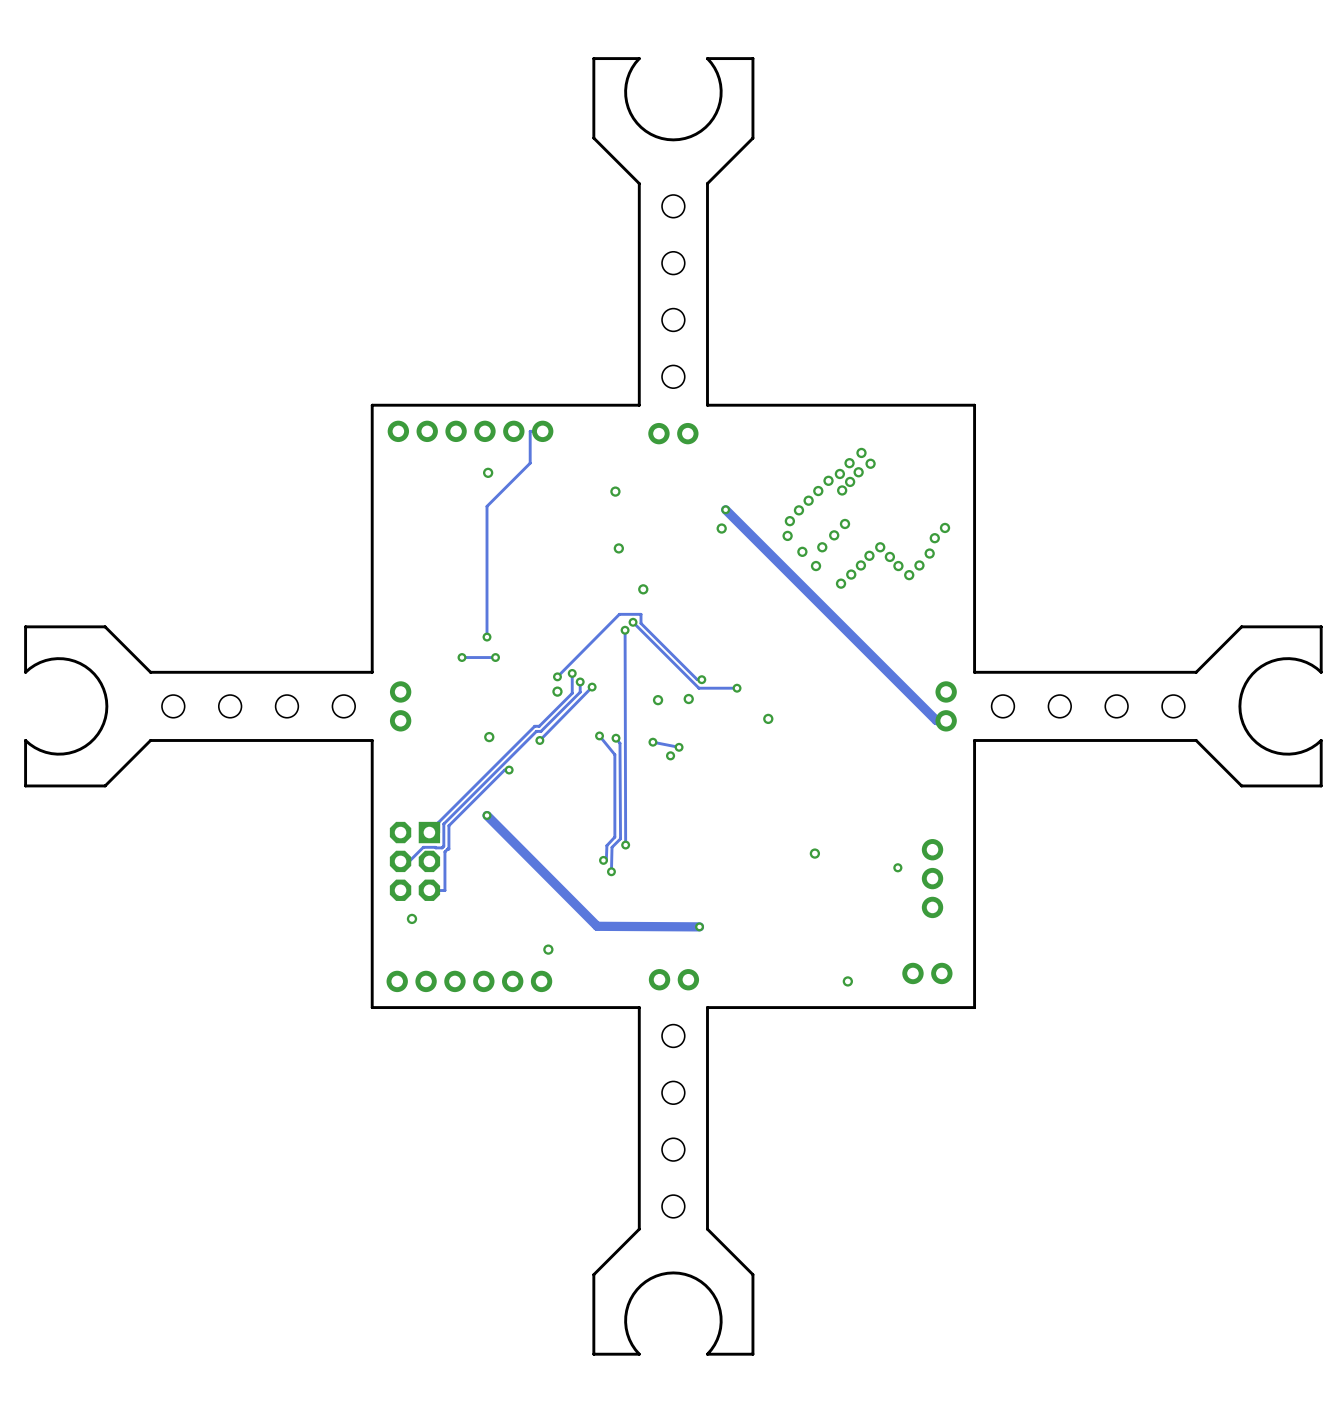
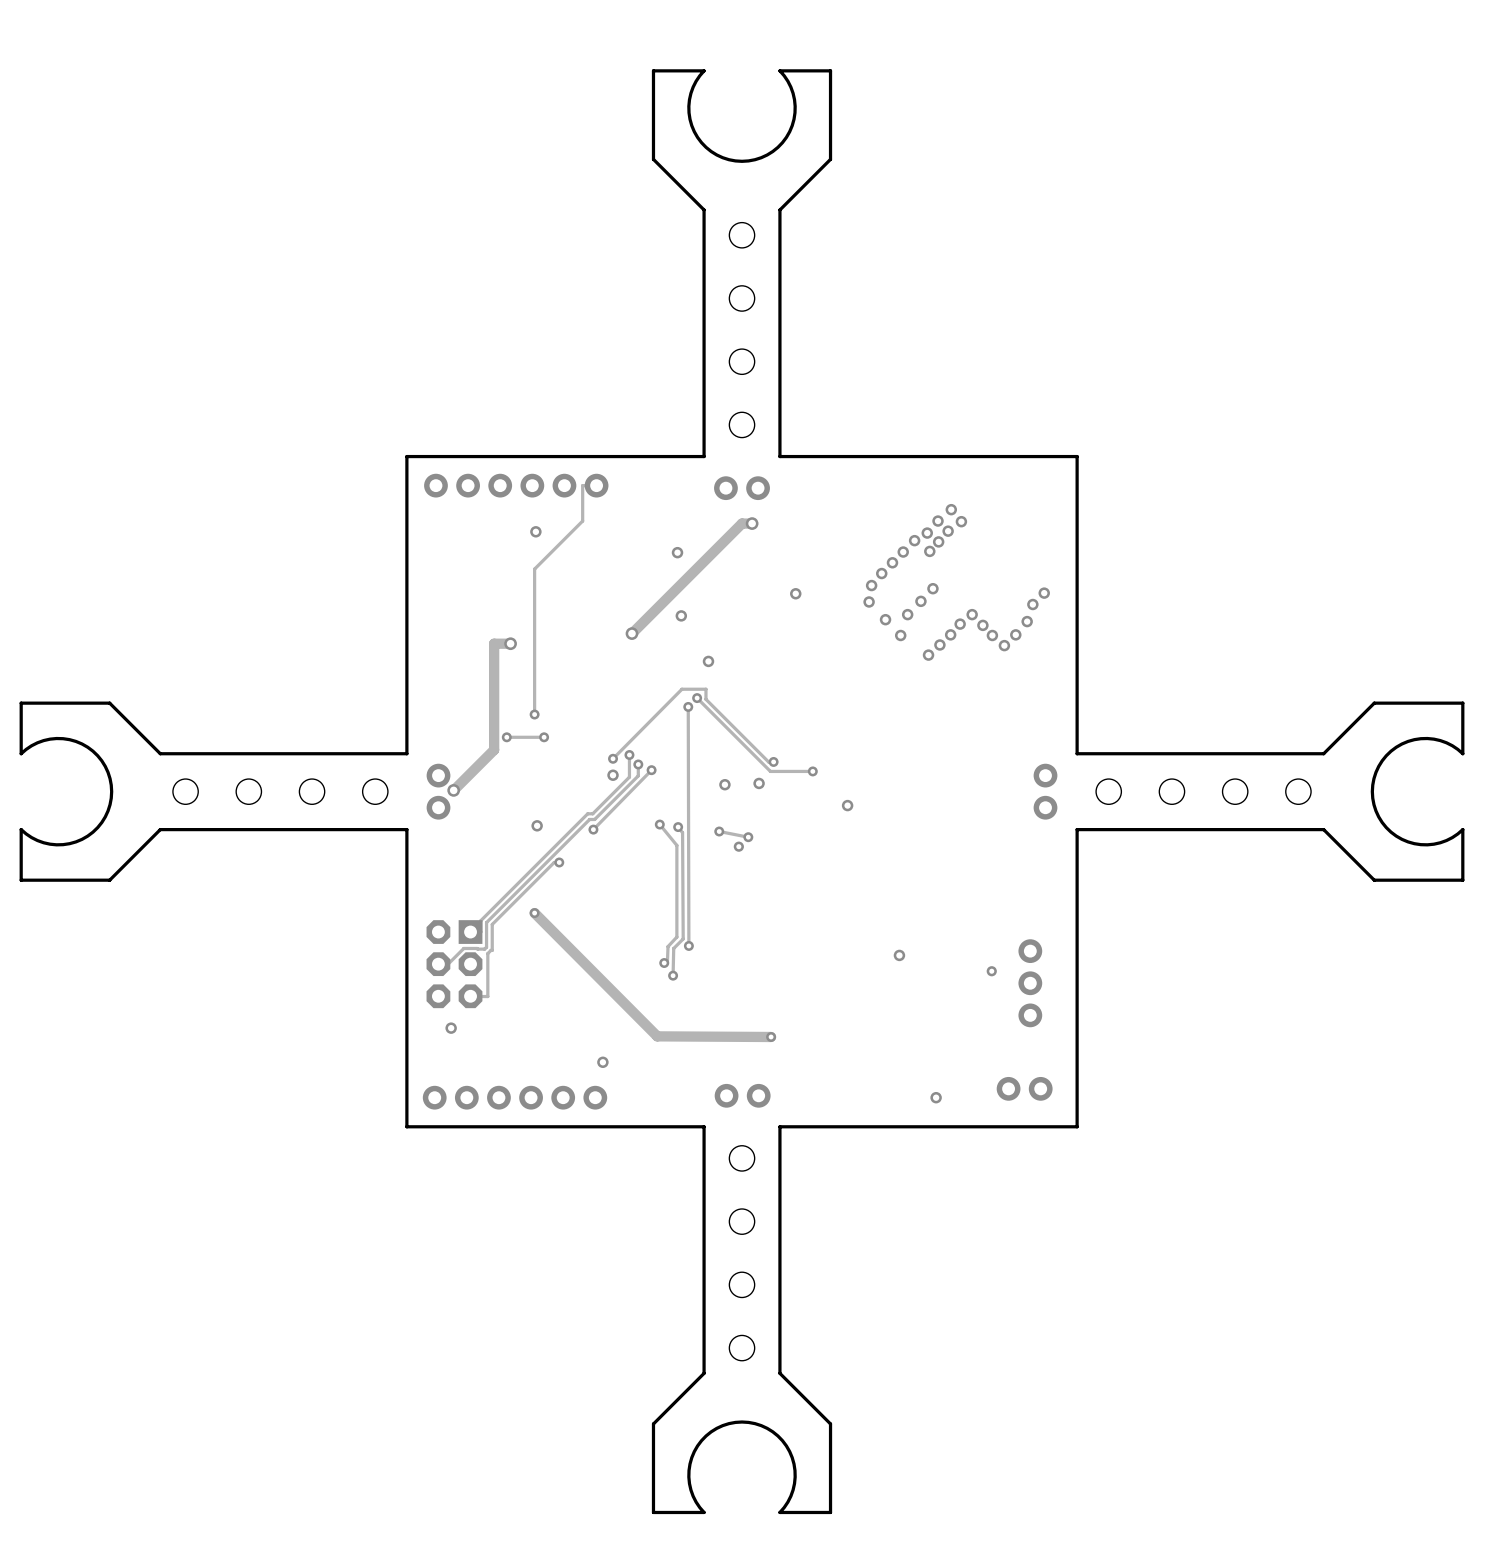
track: none -> (752, 523) (742, 523) (631, 633)
via: none -> (752, 523)
track: (725, 509) (936, 720) (946, 720) -> none
via: (725, 509) -> none
via: none -> (631, 633)
track: none -> (510, 643) (494, 643) (494, 749) (453, 790)
via: none -> (510, 643)
via: none -> (453, 790)

